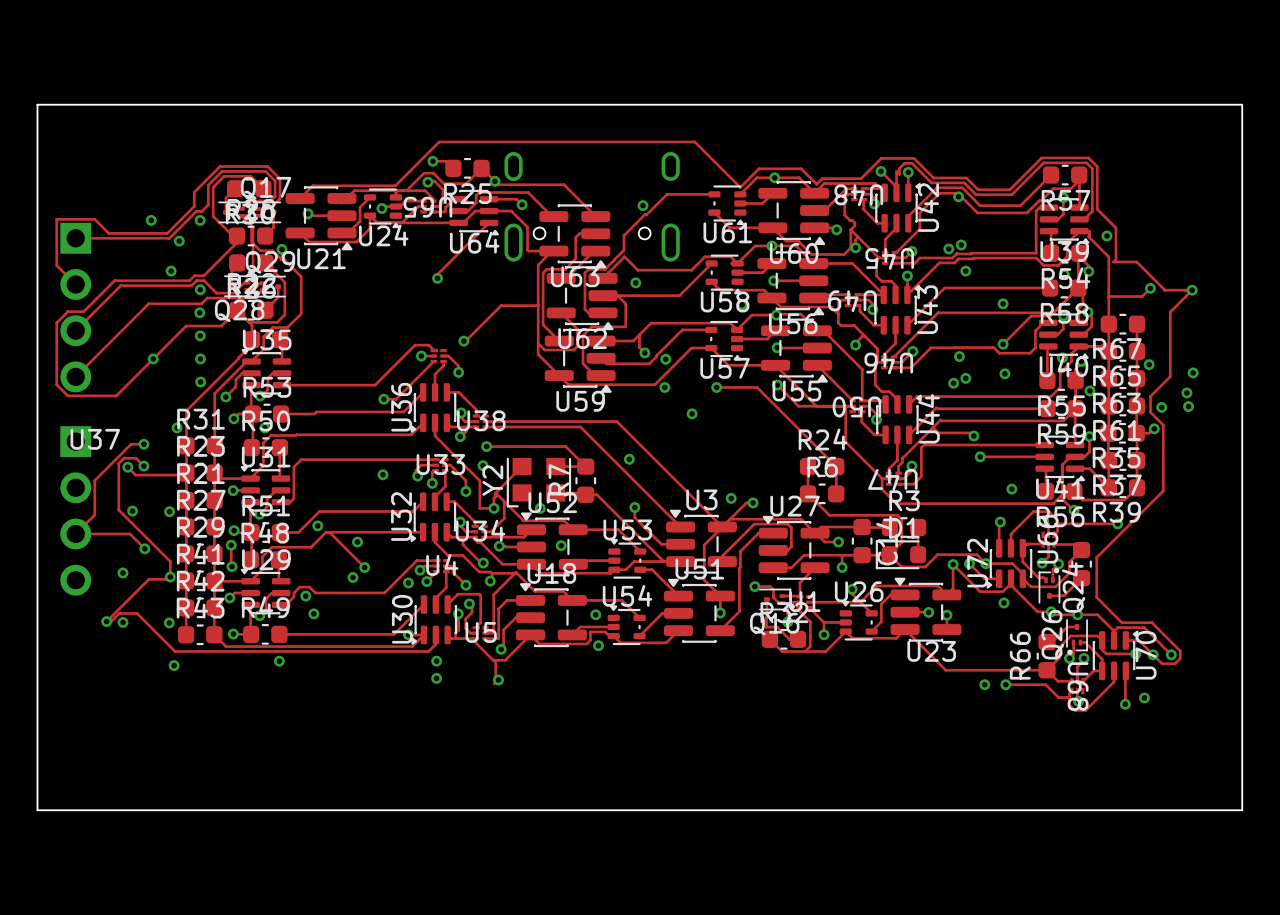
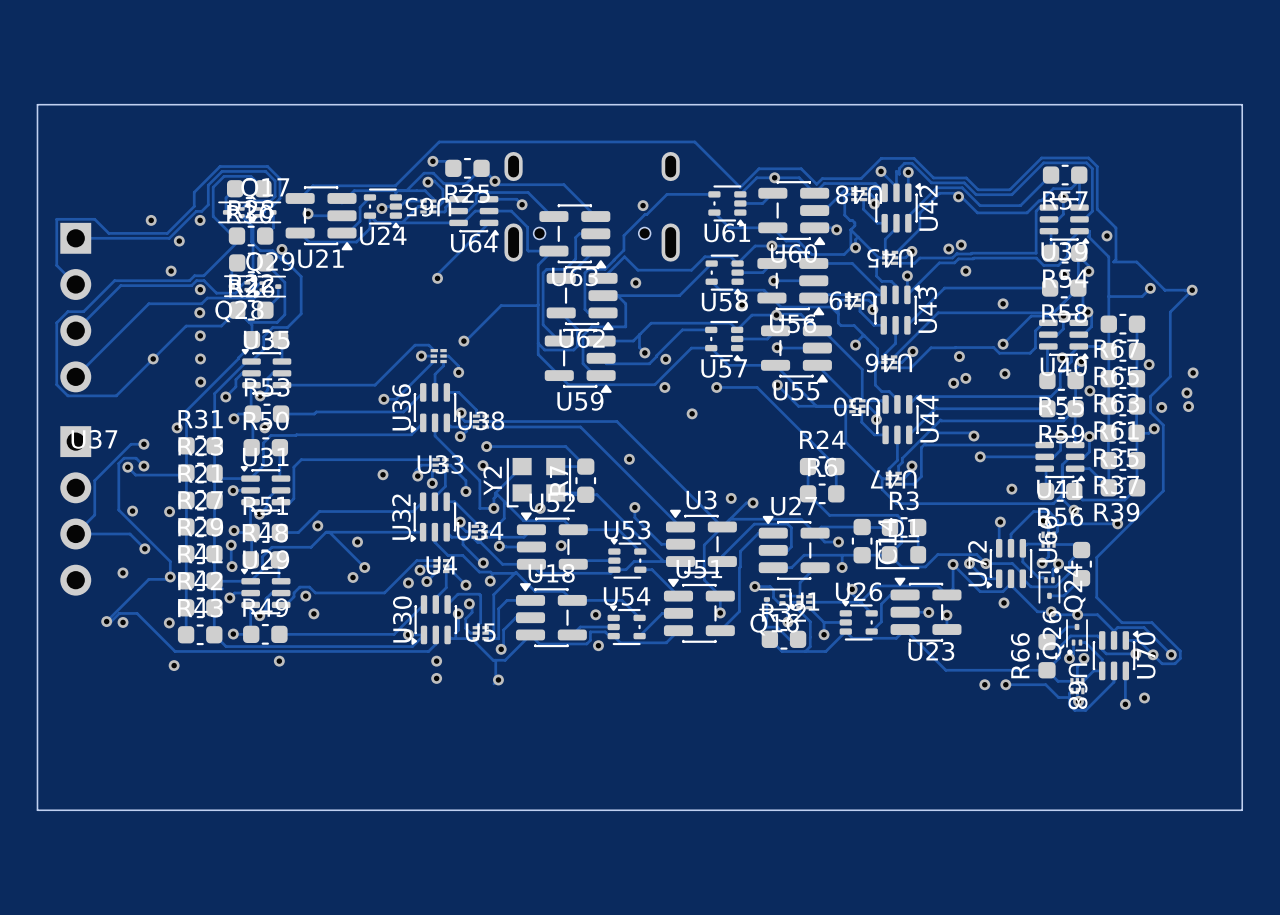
track: none -> (1060, 435) (1060, 450) (1054, 456) (1044, 456)
via: none -> (1060, 435)

